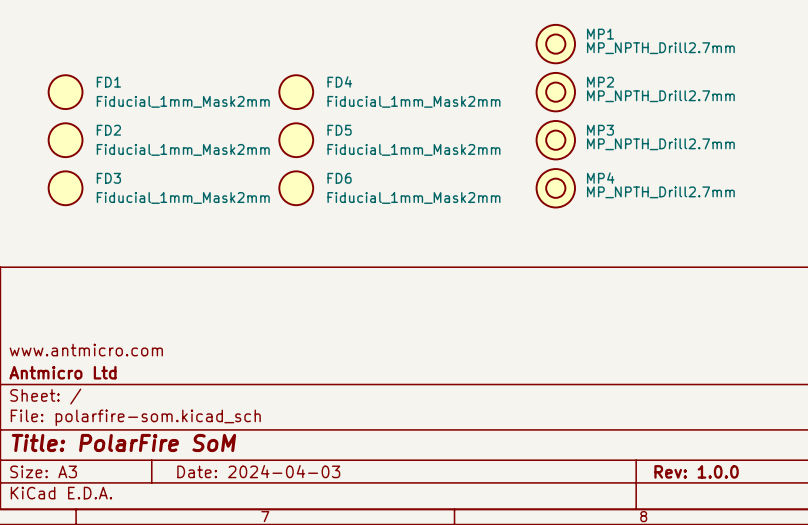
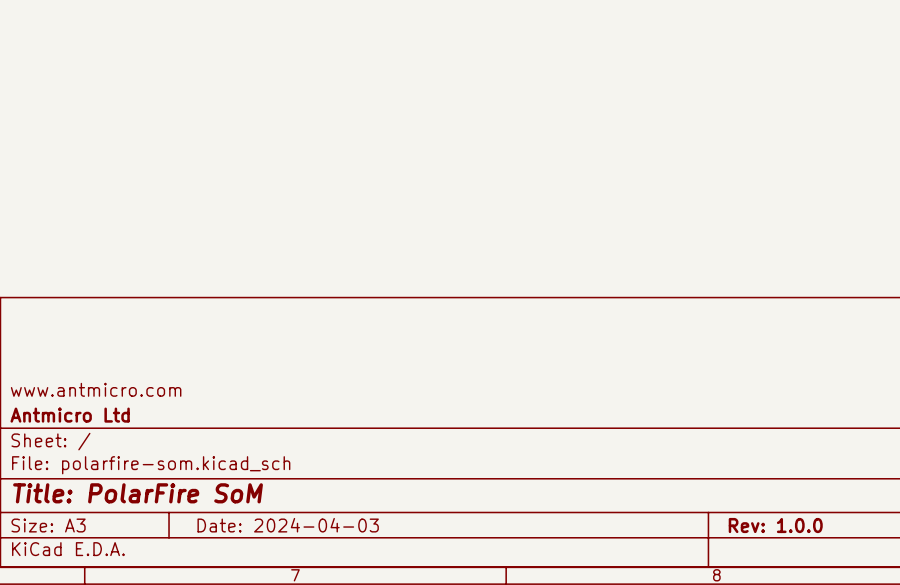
MP1: MP_NPTH_Drill2.7mm (555, 44) -> none
FD1: Fiducial_1mm_Mask2mm (65, 92) -> none
FD4: Fiducial_1mm_Mask2mm (296, 92) -> none
MP2: MP_NPTH_Drill2.7mm (555, 92) -> none
FD2: Fiducial_1mm_Mask2mm (65, 140) -> none
FD5: Fiducial_1mm_Mask2mm (296, 140) -> none
MP3: MP_NPTH_Drill2.7mm (555, 140) -> none
FD3: Fiducial_1mm_Mask2mm (65, 188) -> none
FD6: Fiducial_1mm_Mask2mm (296, 188) -> none
MP4: MP_NPTH_Drill2.7mm (555, 188) -> none

